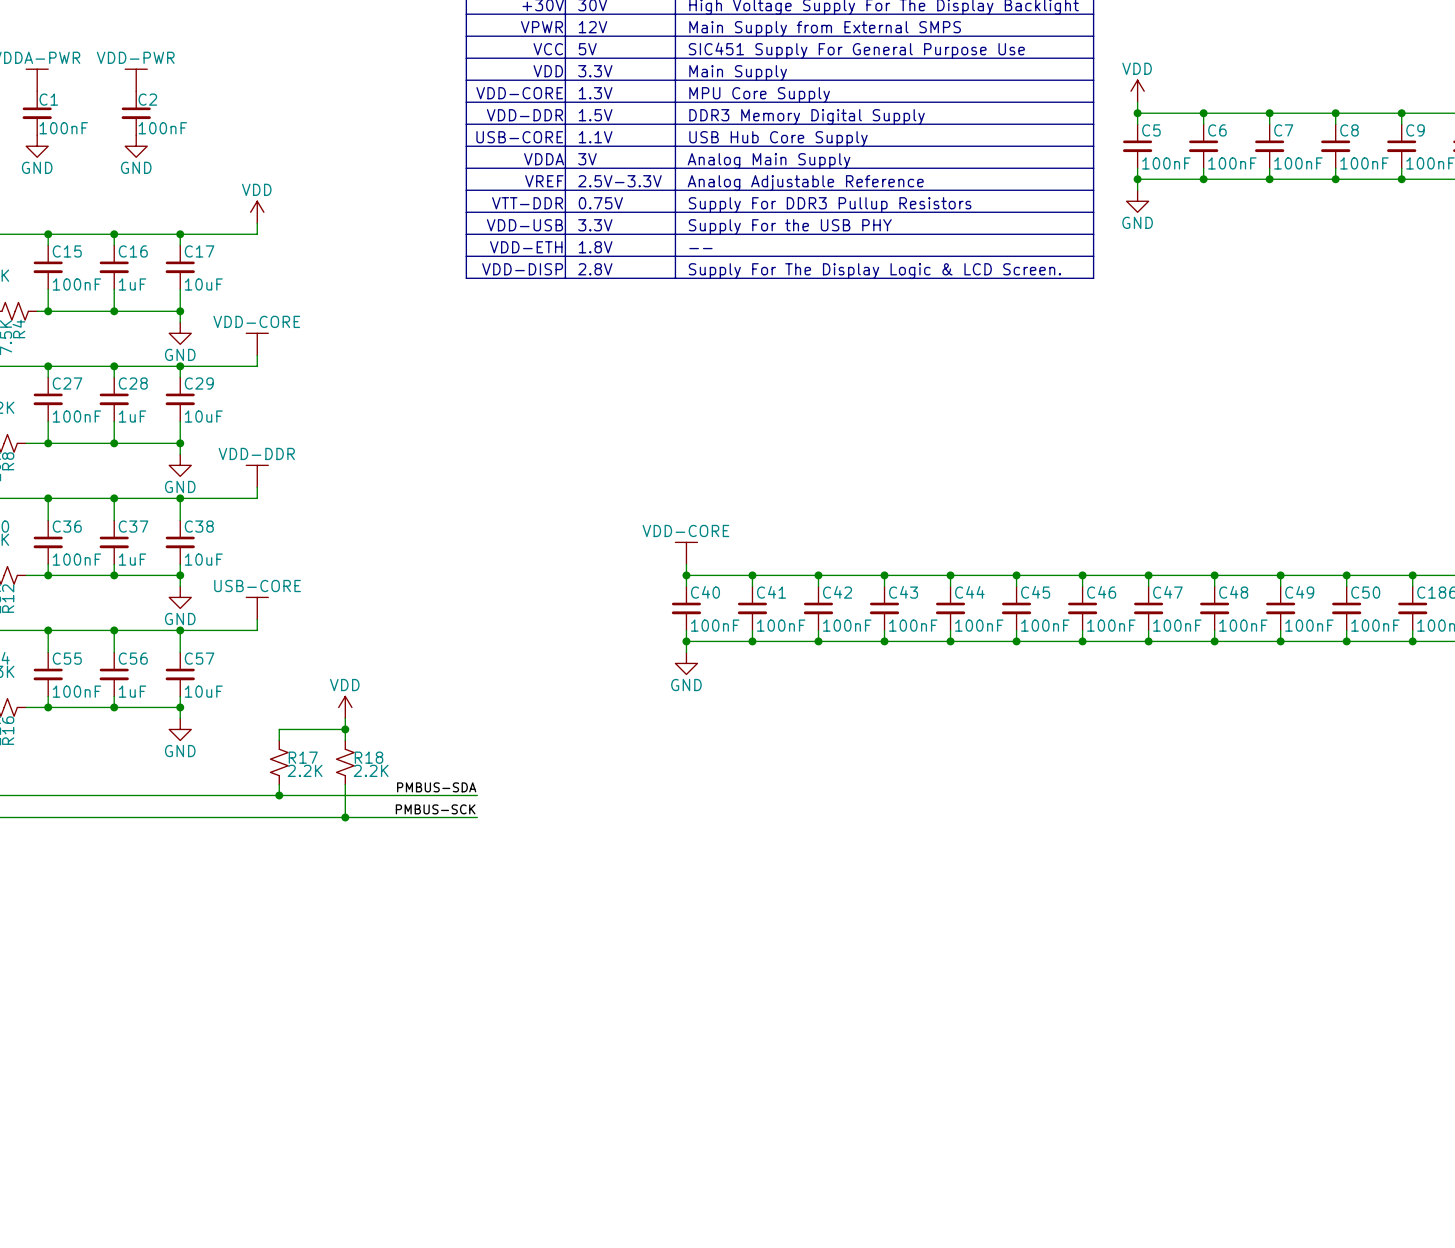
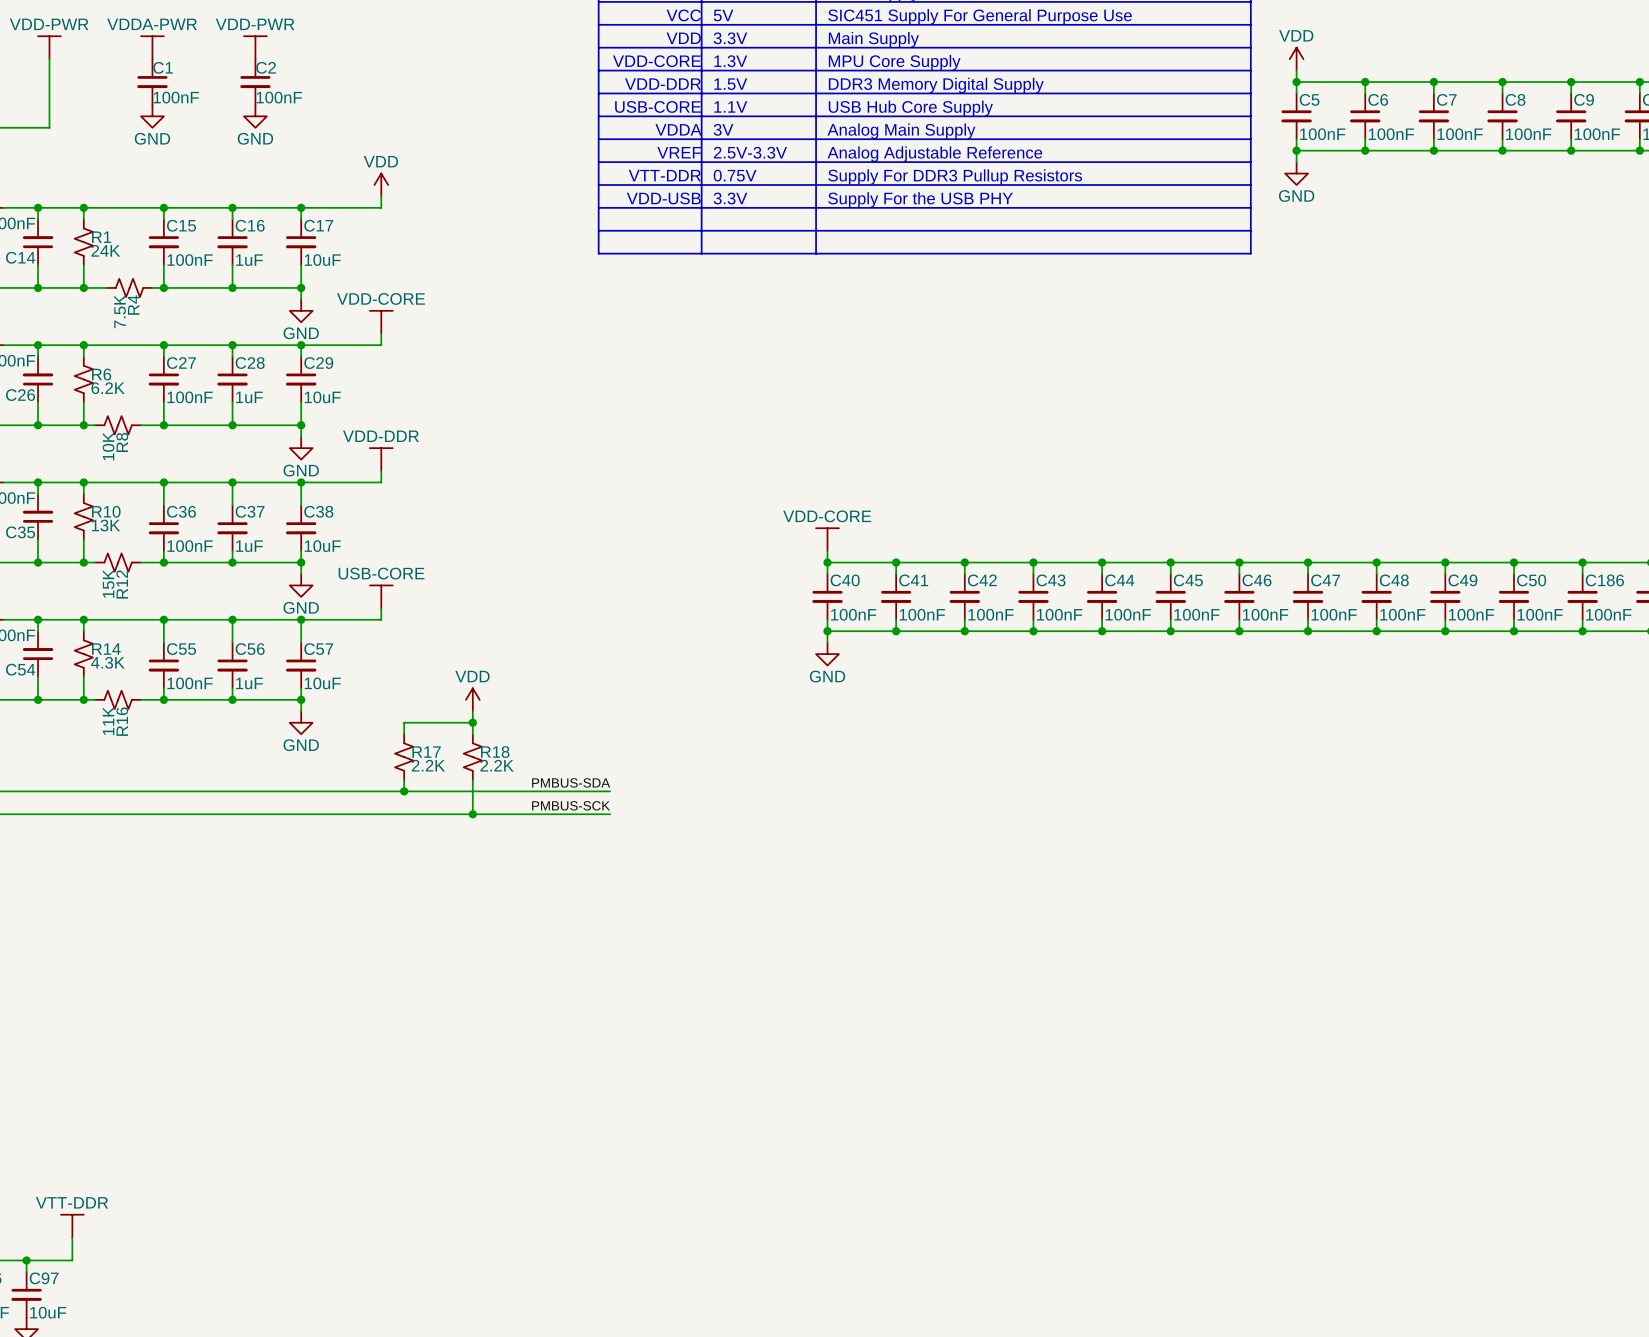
text: VDD-ETH (526, 247) -> none
text: 1.8V (595, 247) -> none
text: -- (700, 248) -> none
text: VDD-DISP (522, 269) -> none
text: 2.8V (595, 269) -> none
text: Supply For The Display Logic & LCD Screen. (874, 271) -> none

